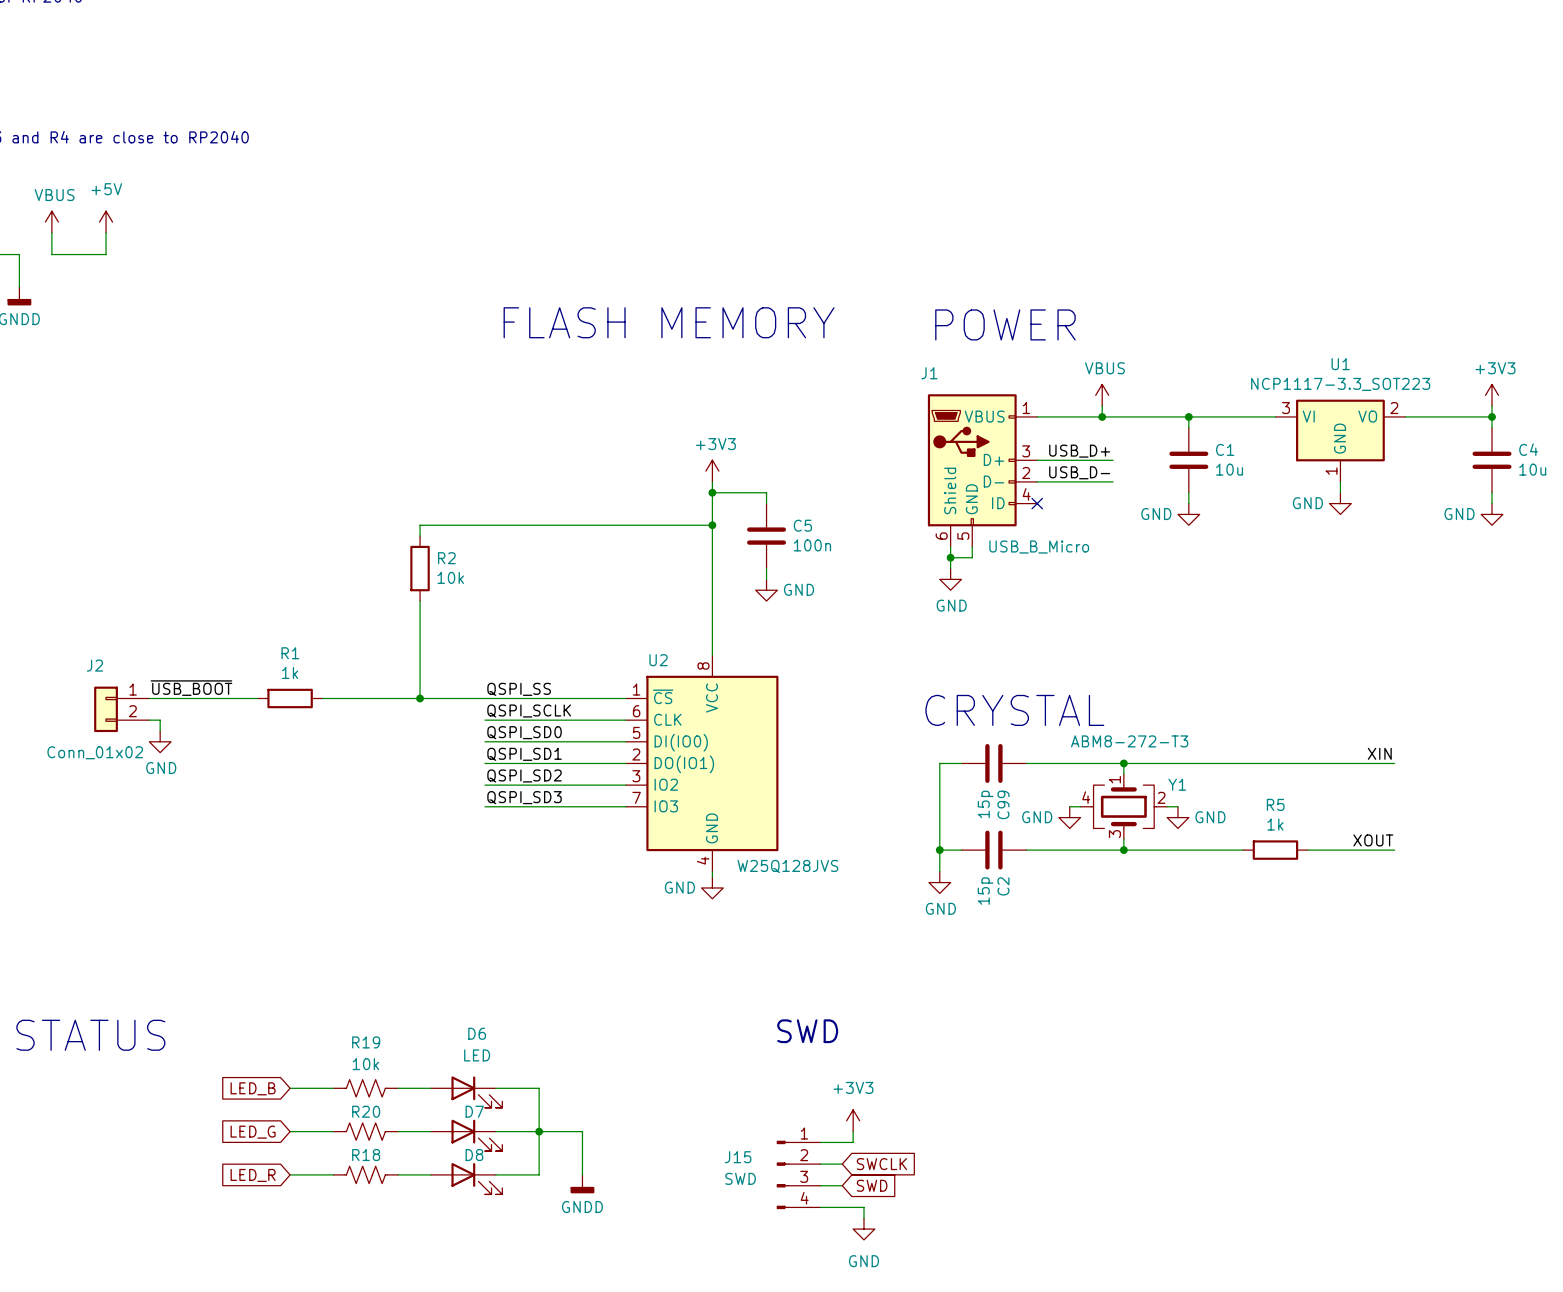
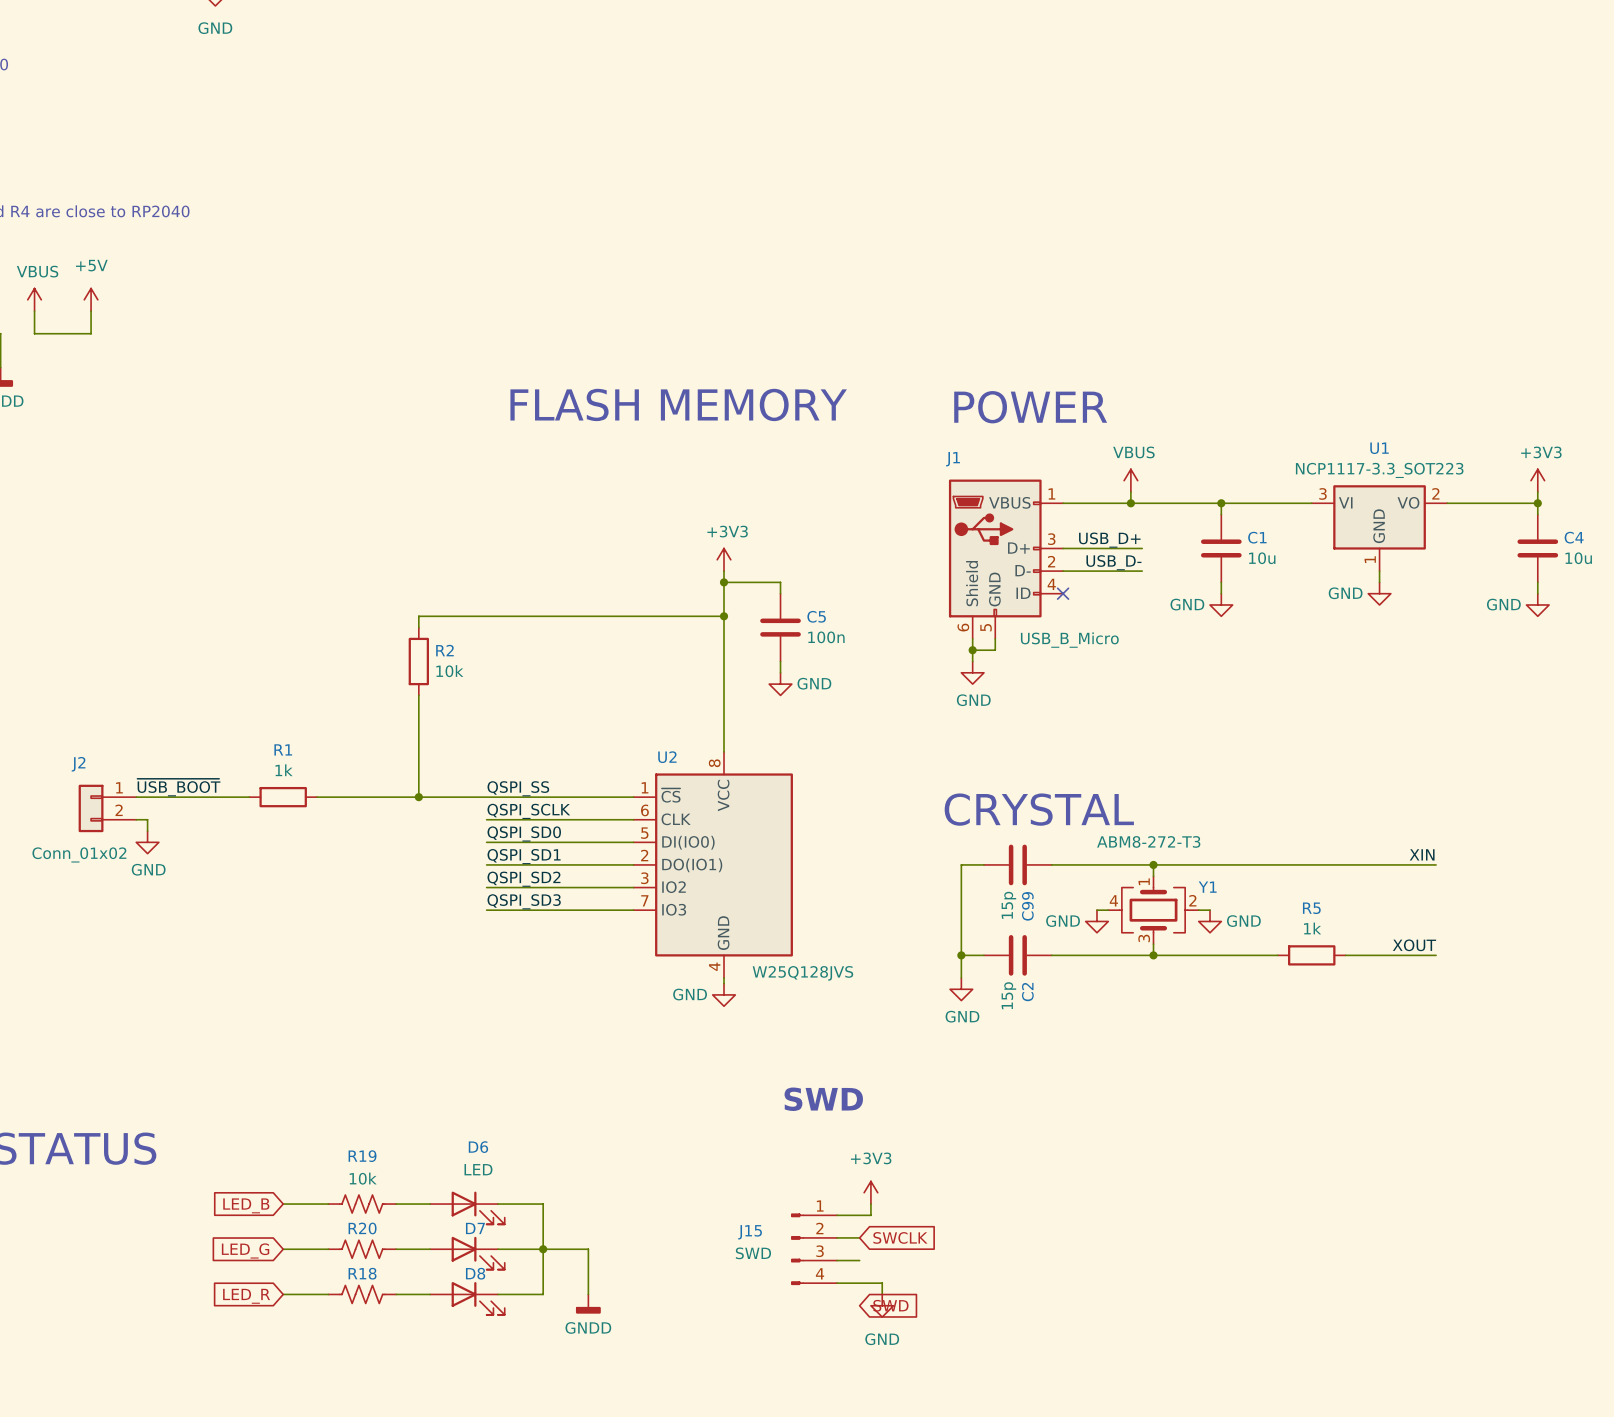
text position: SWD (807, 1031) -> SWD (823, 1099)
wire: none -> (870, 1204) (870, 1215) (837, 1215)
power symbol position: +3V3 (853, 1120) -> +3V3 (870, 1192)
wire: (853, 1131) (853, 1142) (842, 1142) -> none
wire: none -> (859, 1283) (882, 1283) (882, 1294)
global label position: SWCLK (881, 1164) -> SWCLK (900, 1237)
J15 position: (798, 1174) -> (814, 1249)
wire: (820, 1185) (842, 1185) -> (837, 1237) (859, 1237)
wire: (820, 1207) (863, 1207) (863, 1218) -> none
power symbol position: GND (863, 1229) -> GND (882, 1305)

